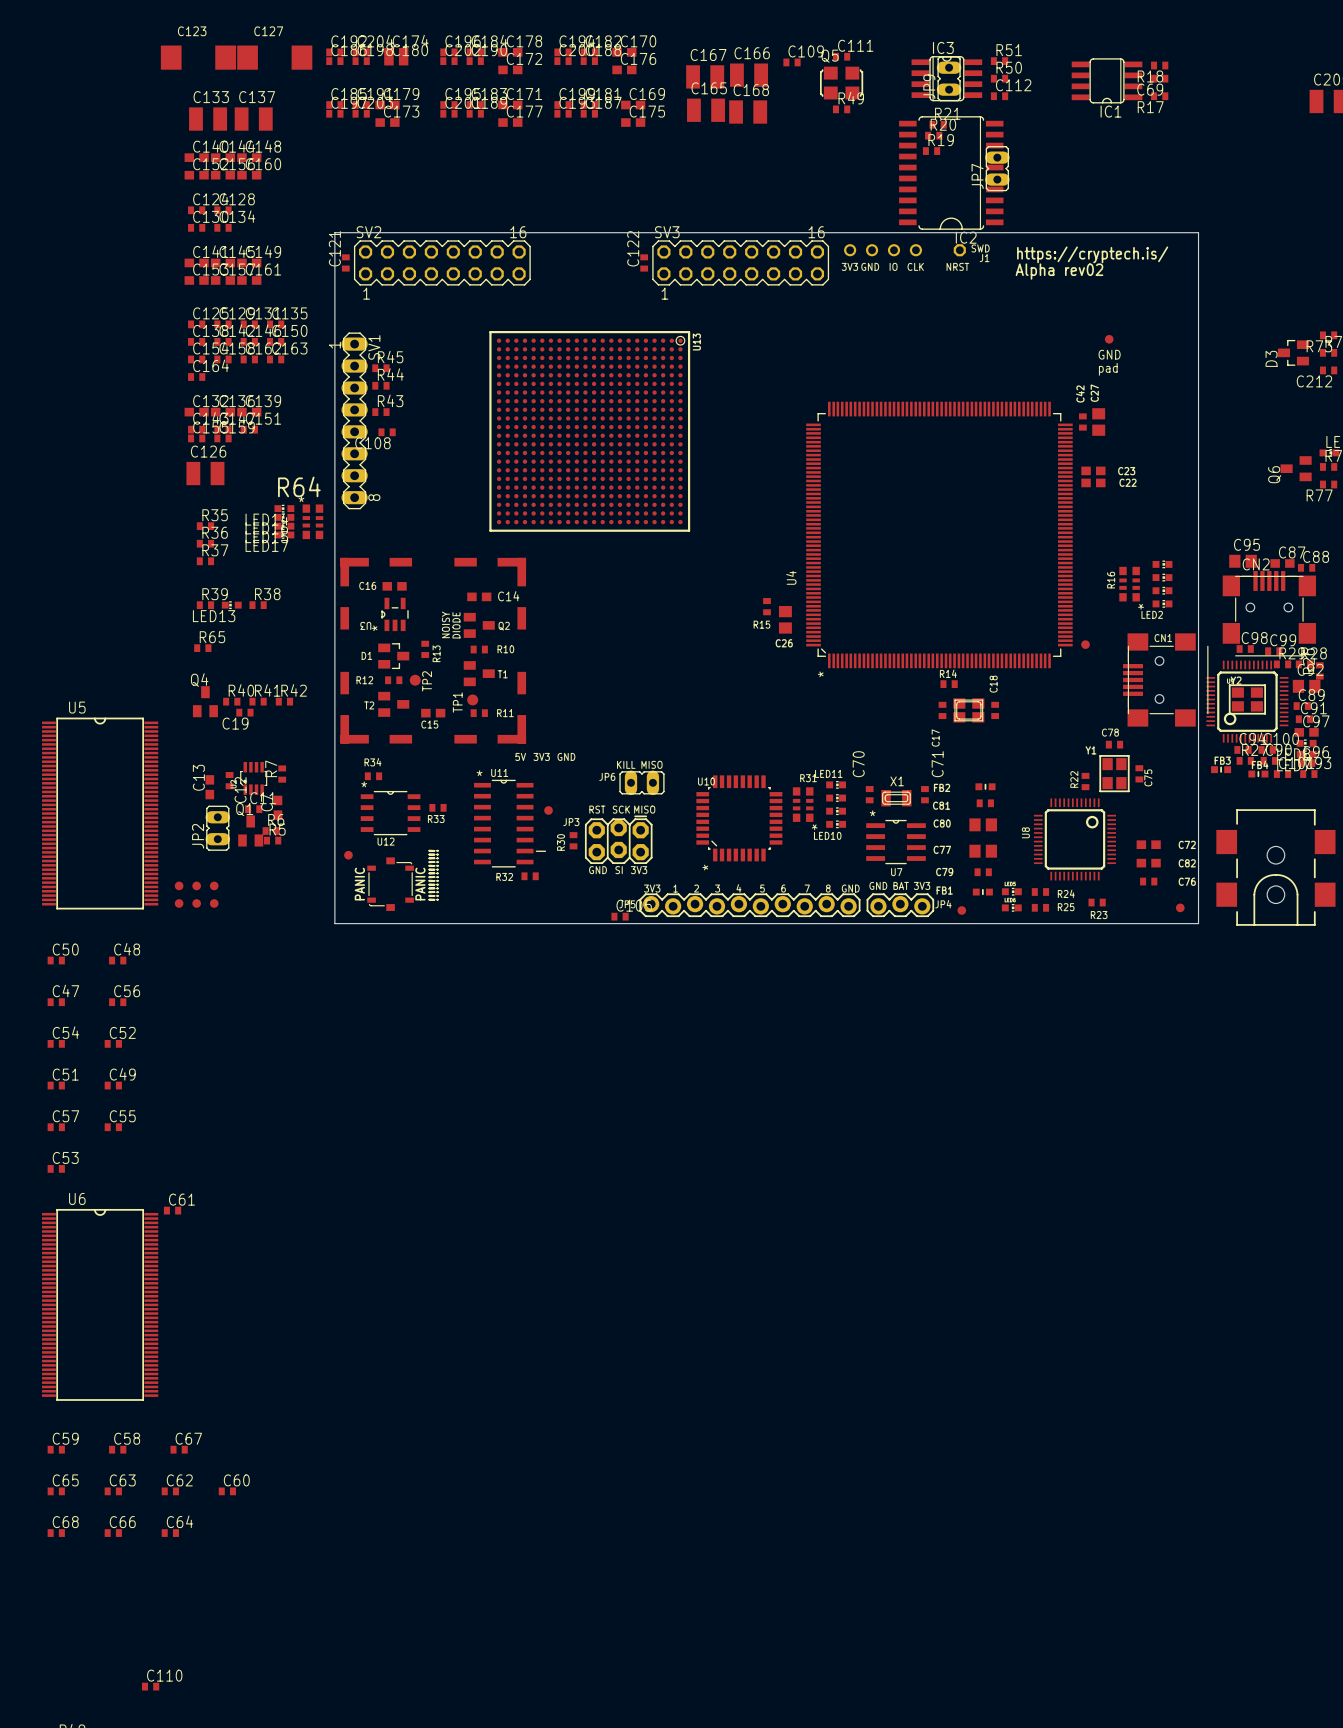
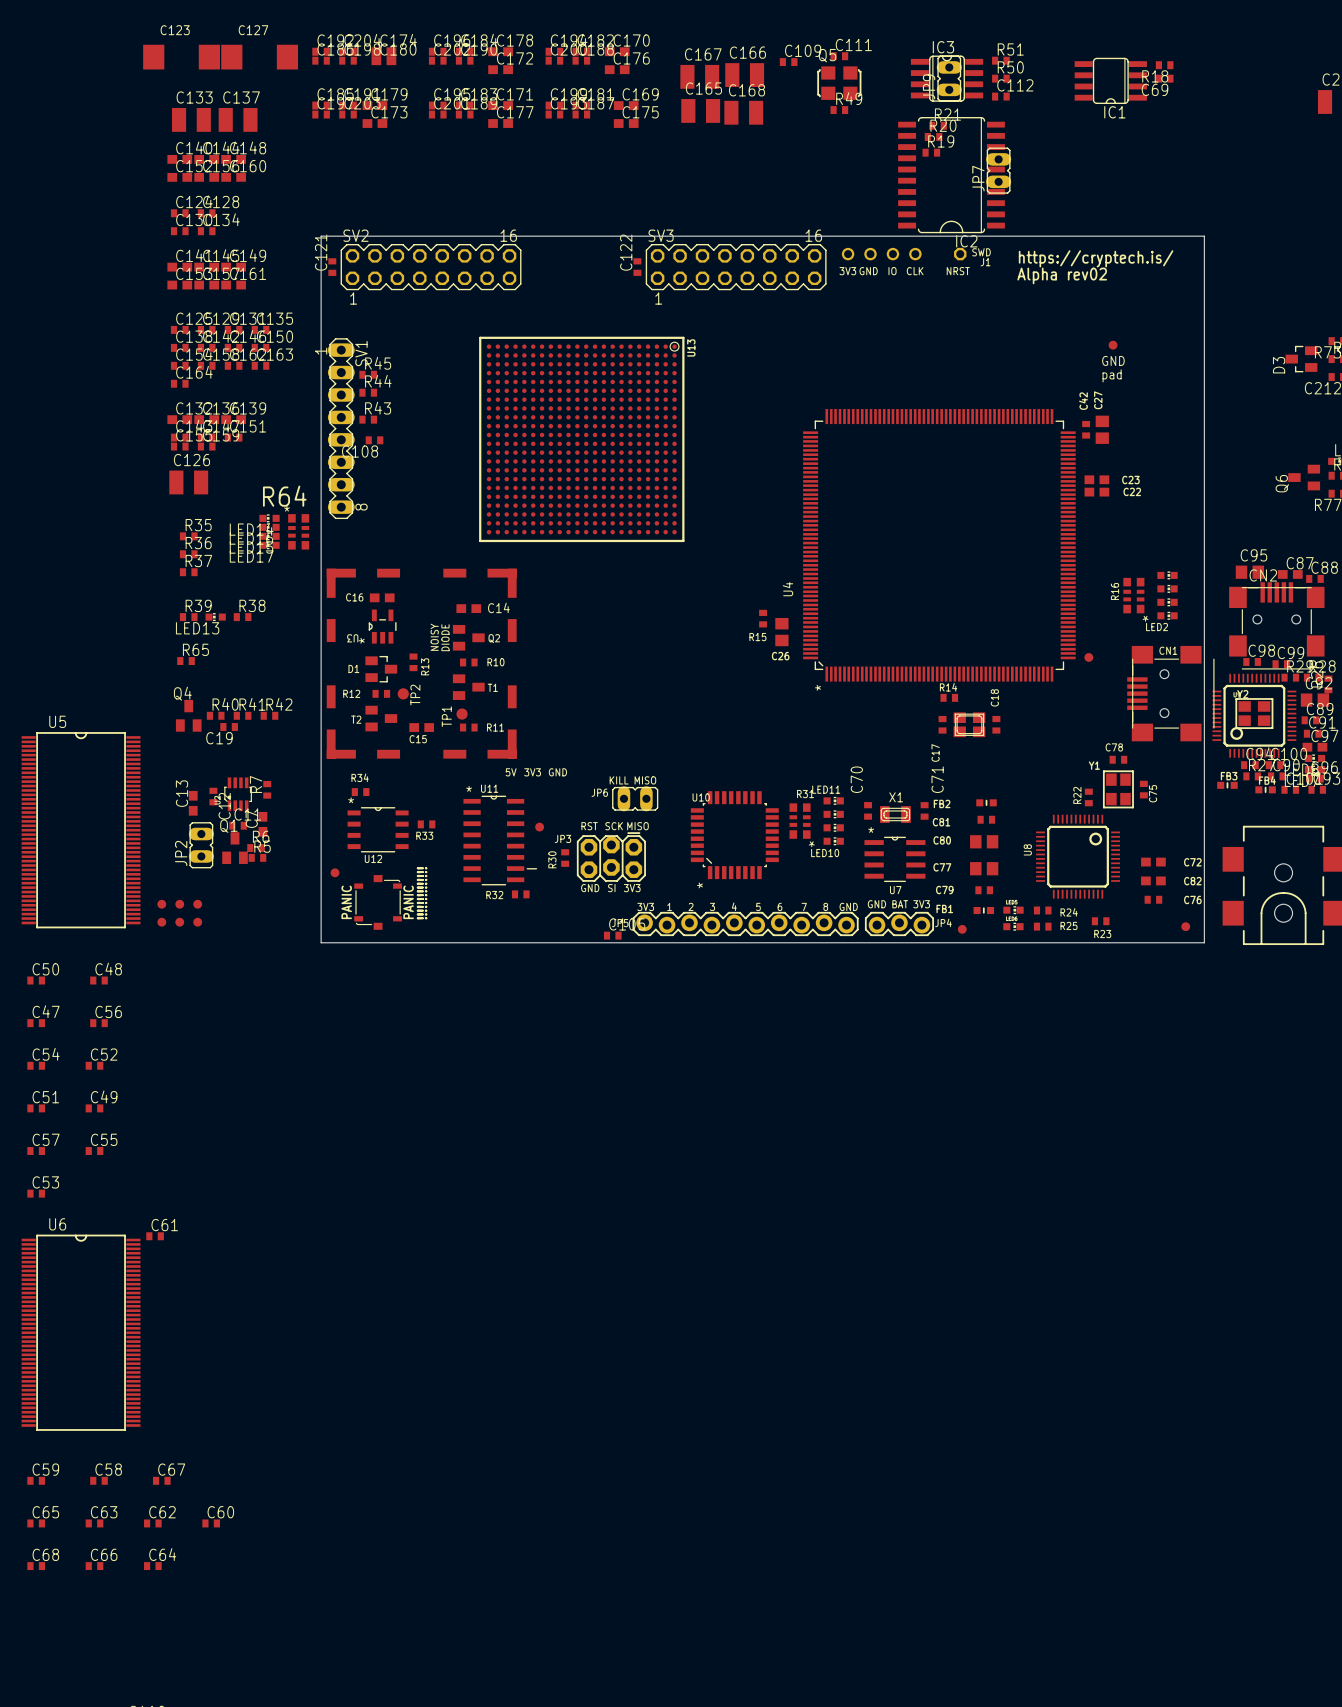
R17: (1159, 96) -> none

